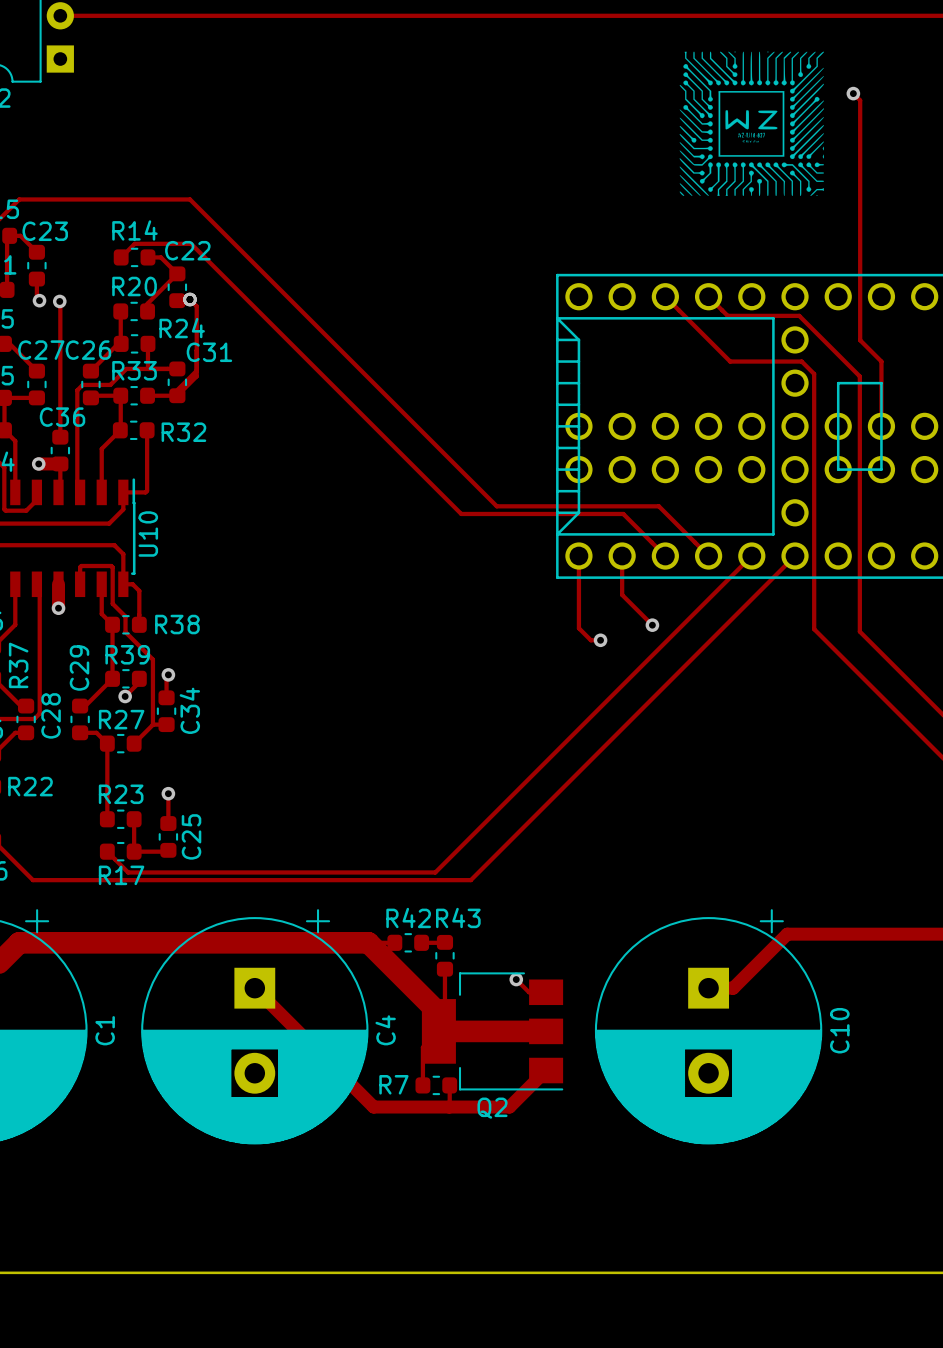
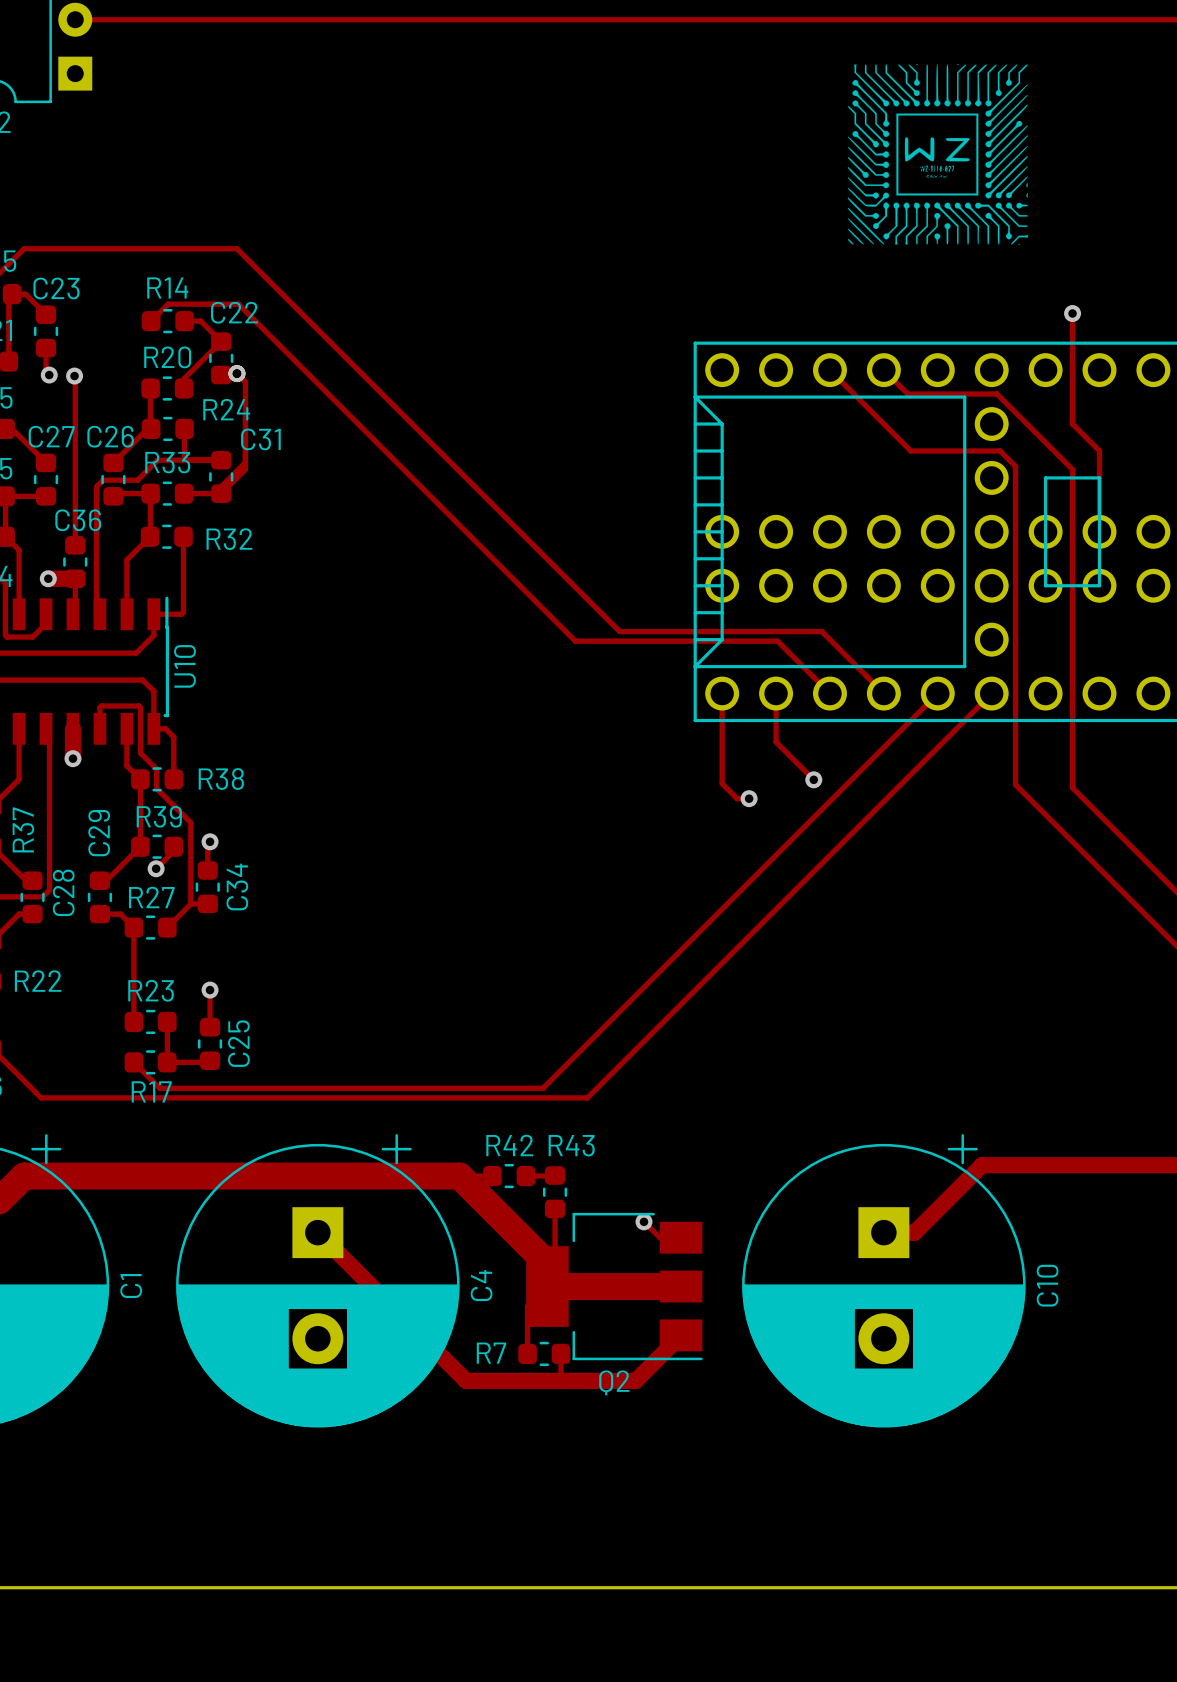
track: (853, 93) (860, 100) (860, 340) -> (1072, 313) (1072, 424)
via: (853, 93) -> none
via: none -> (1072, 313)

